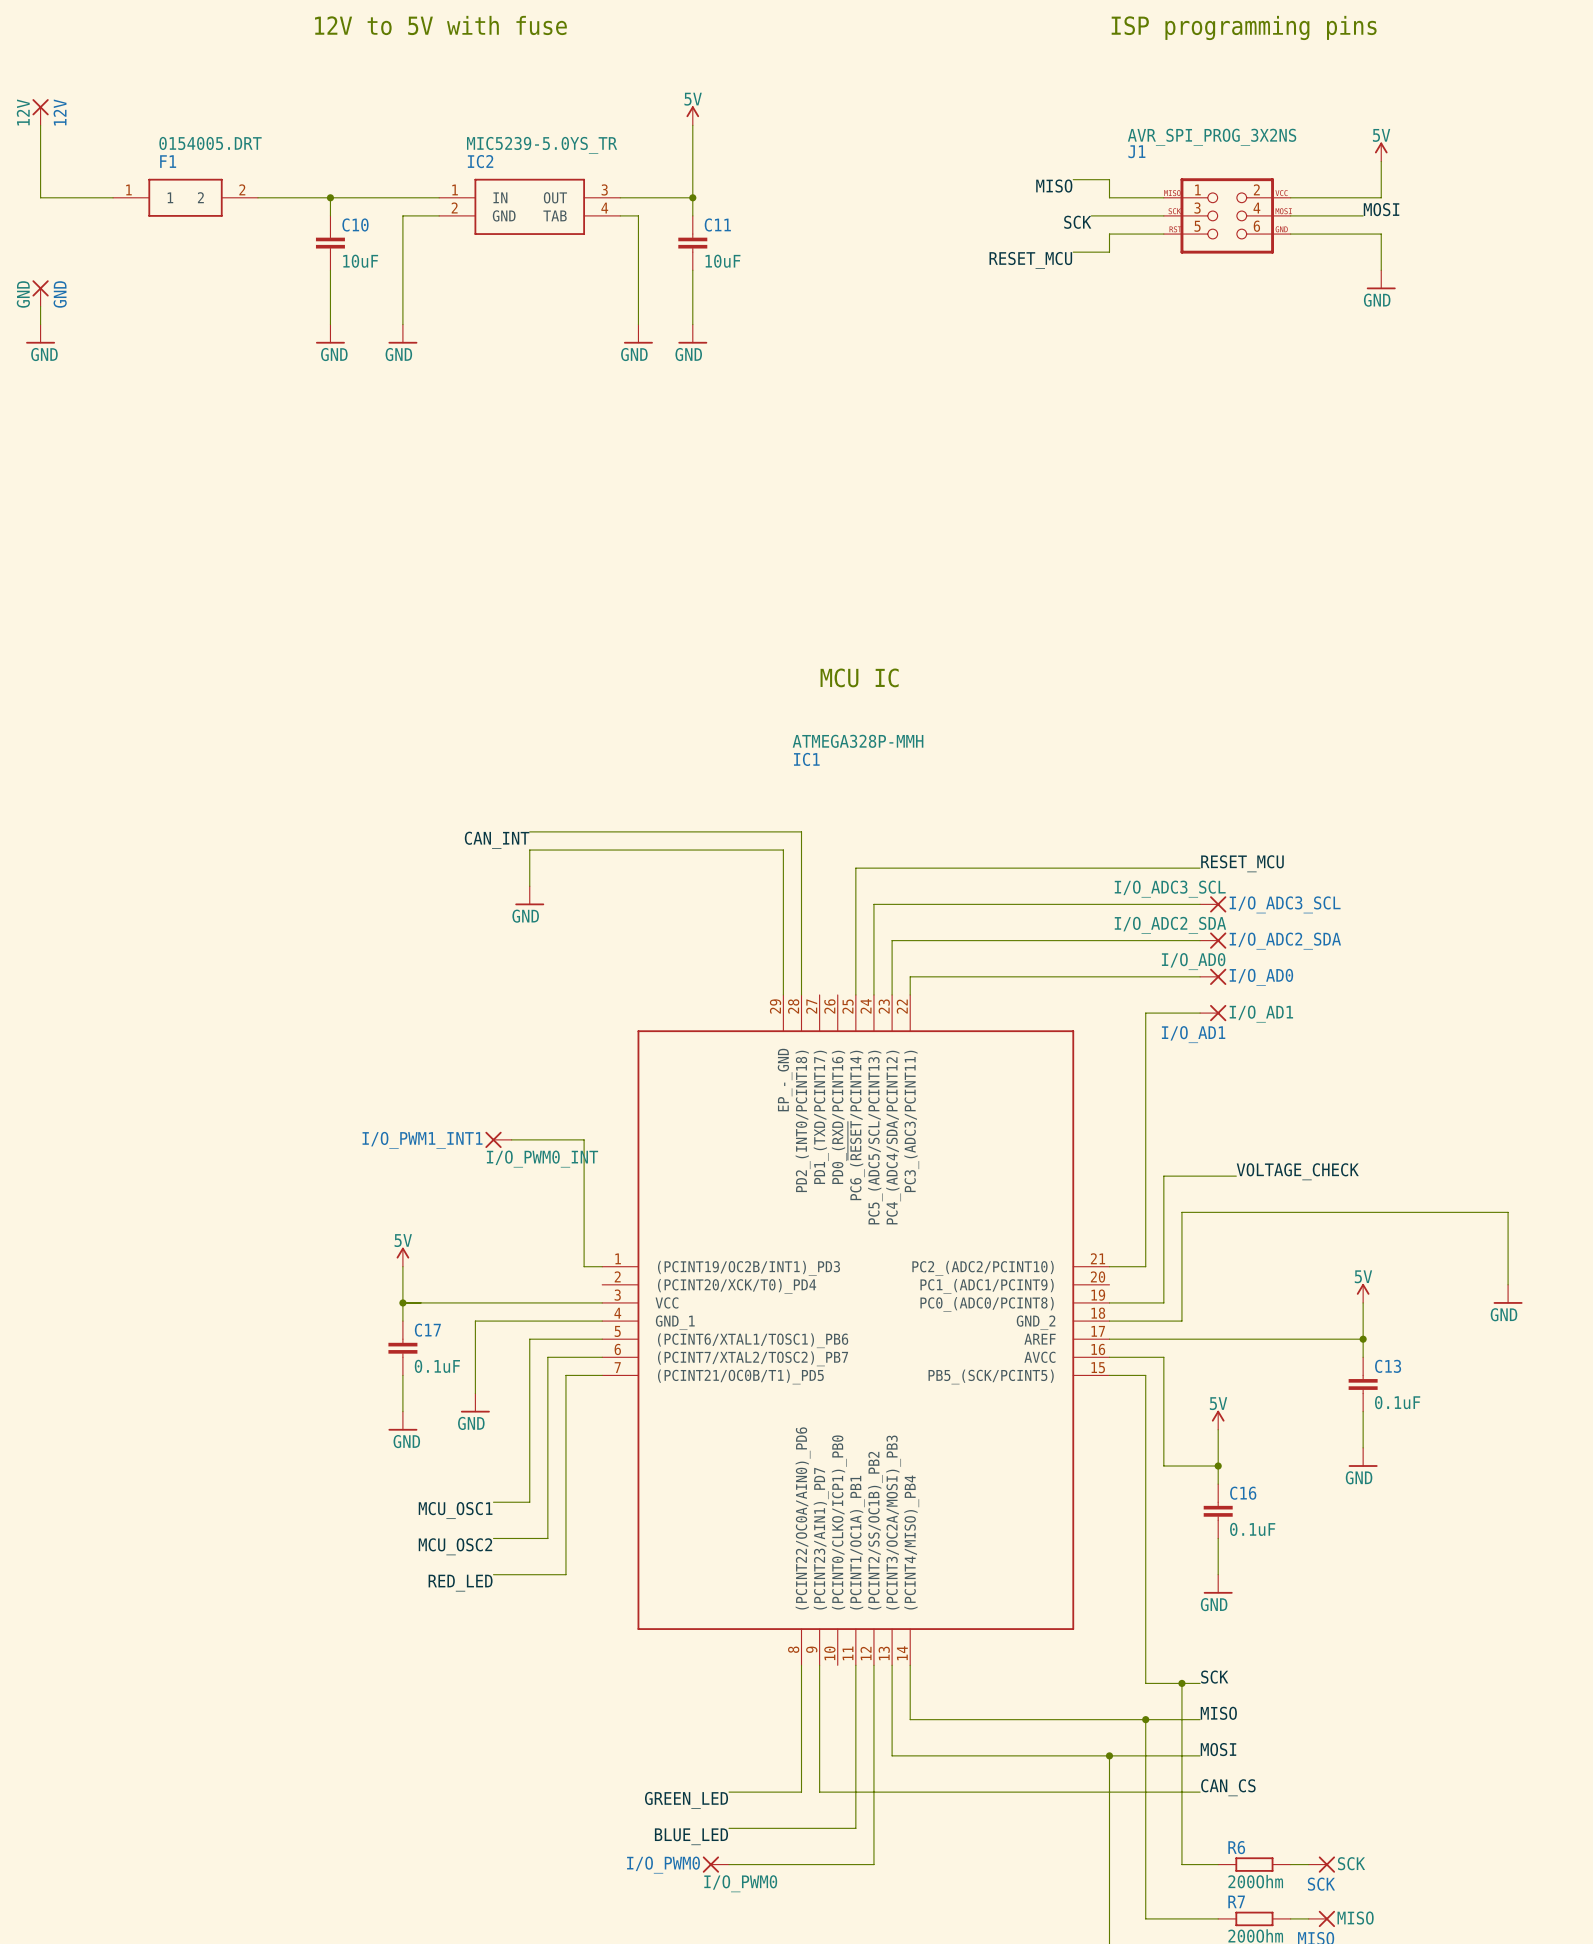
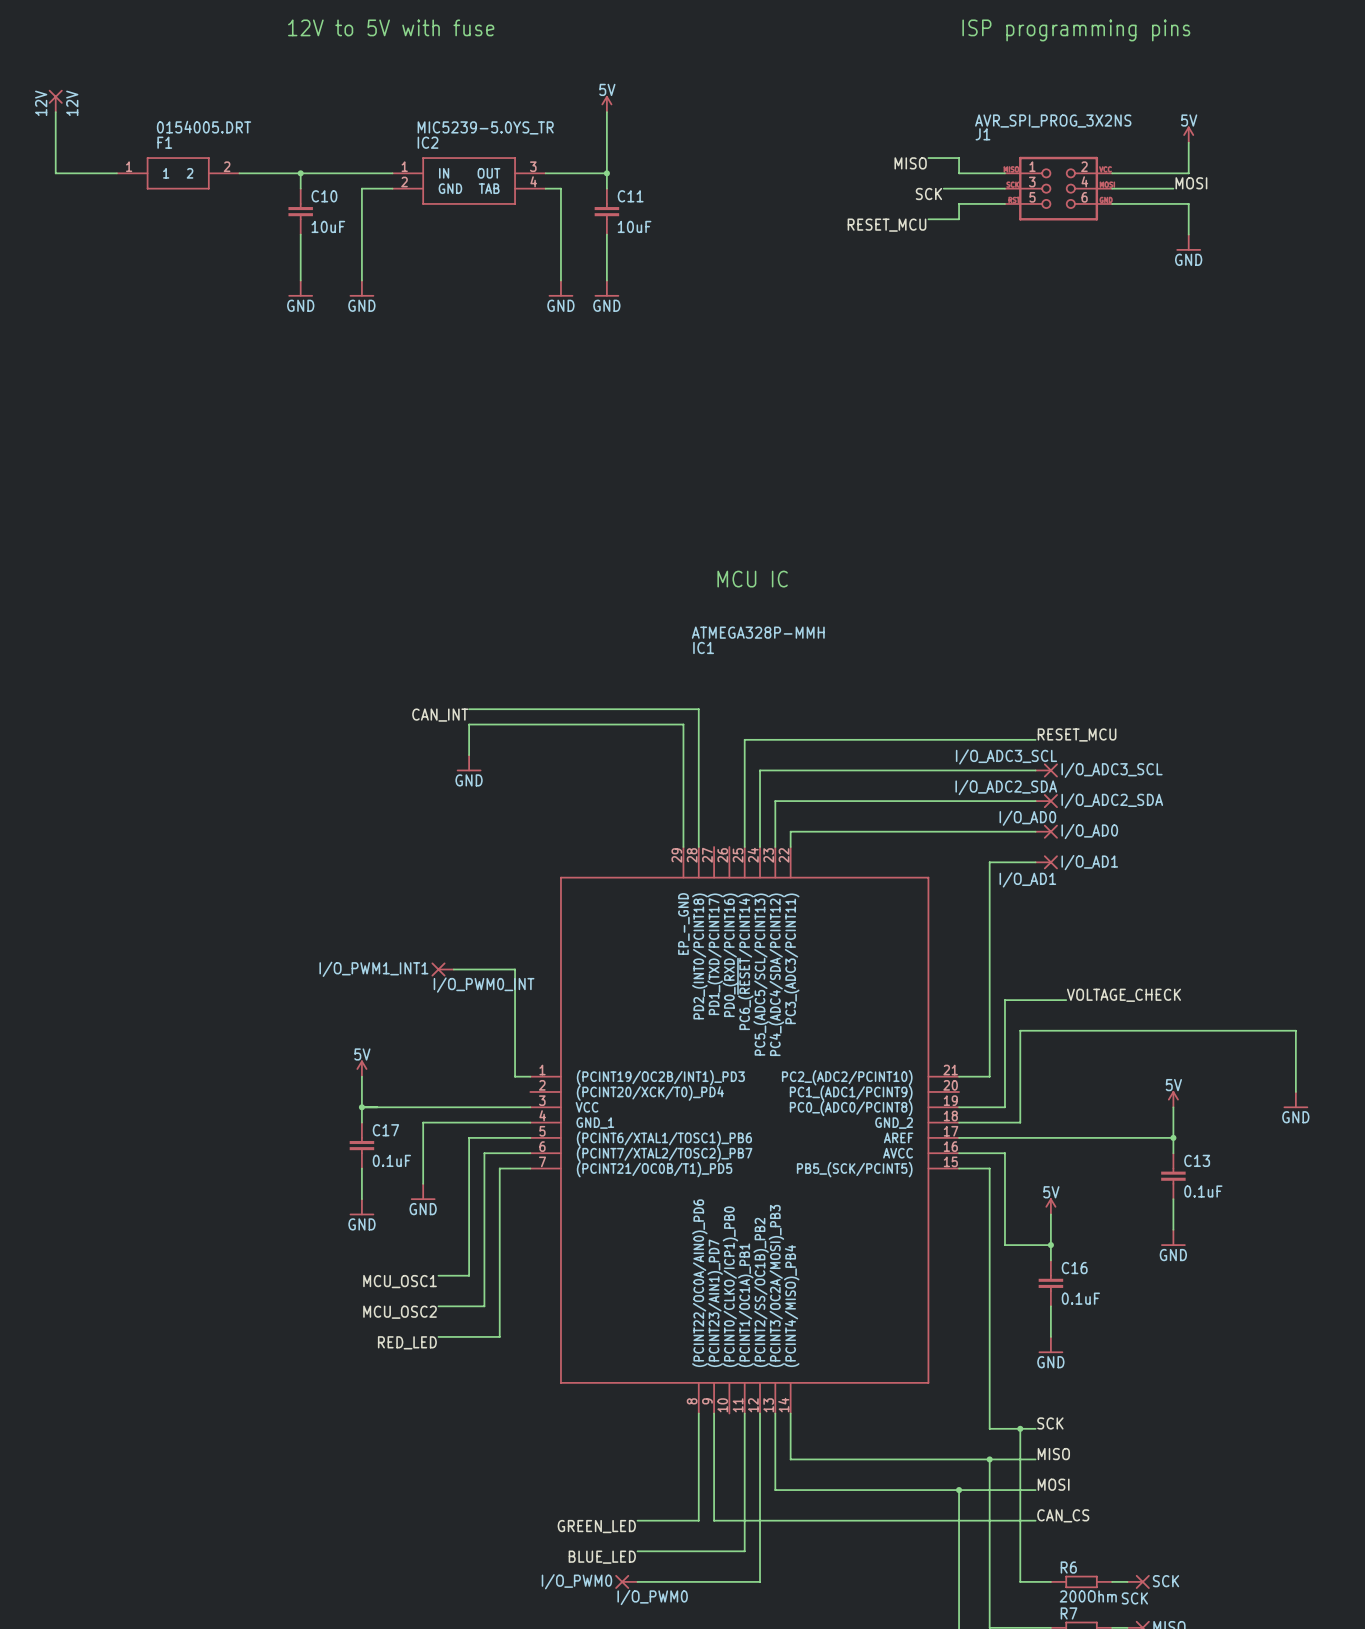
GND: GND (40, 293) -> none
wire: (40, 306) (40, 324) -> none
power symbol: GND (40, 334) -> none

